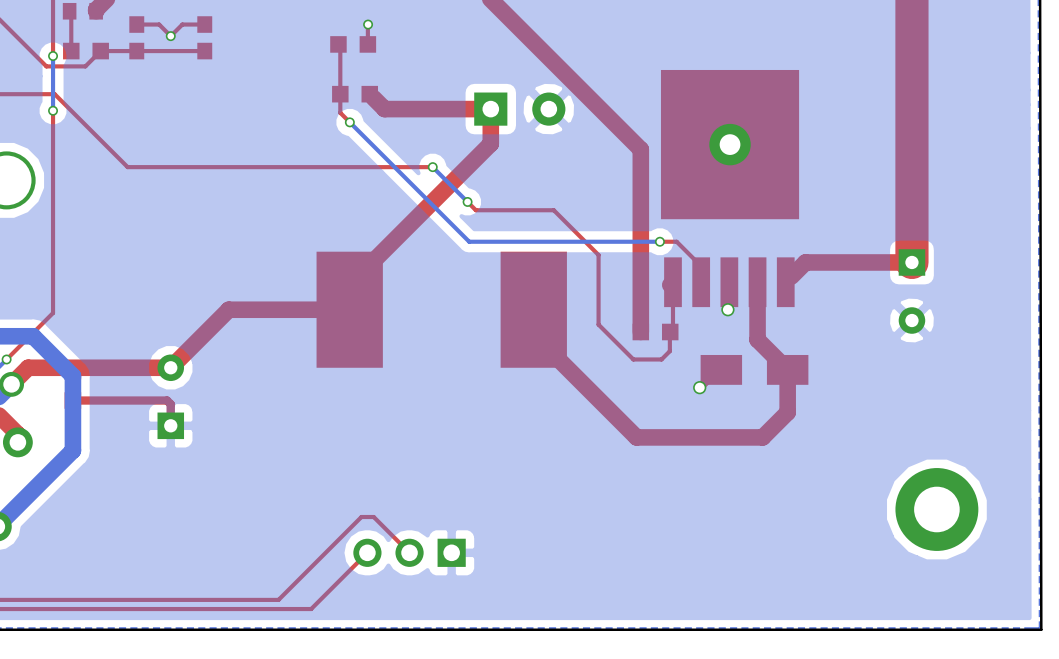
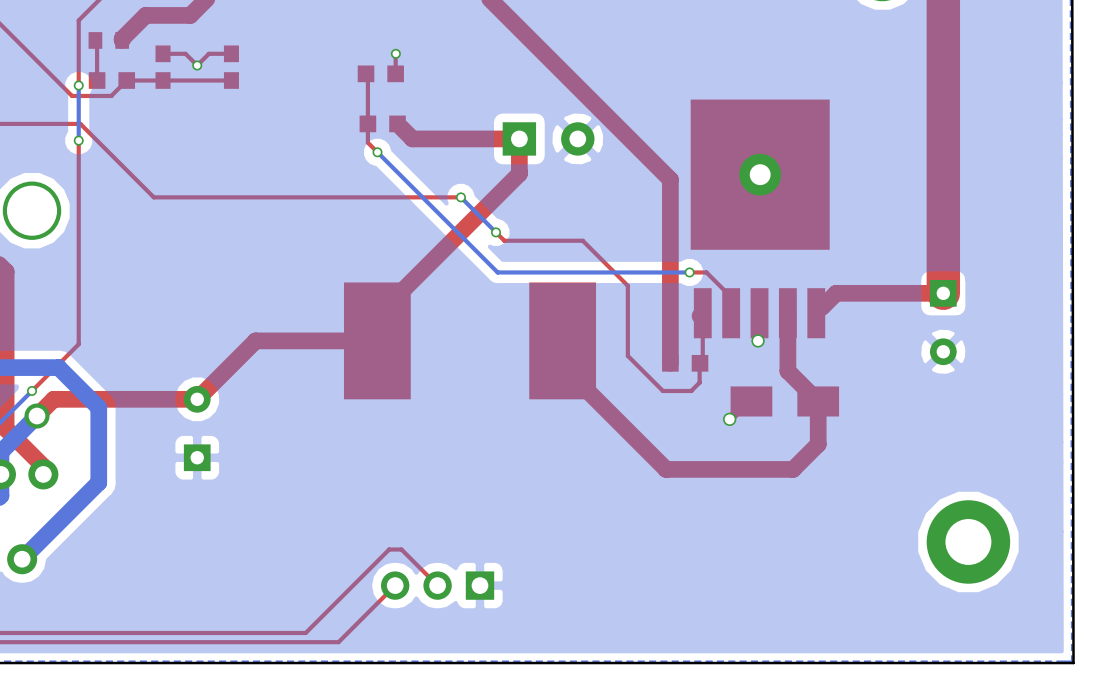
top track: (72, 400) (167, 400) (170, 404) (170, 425) -> none

